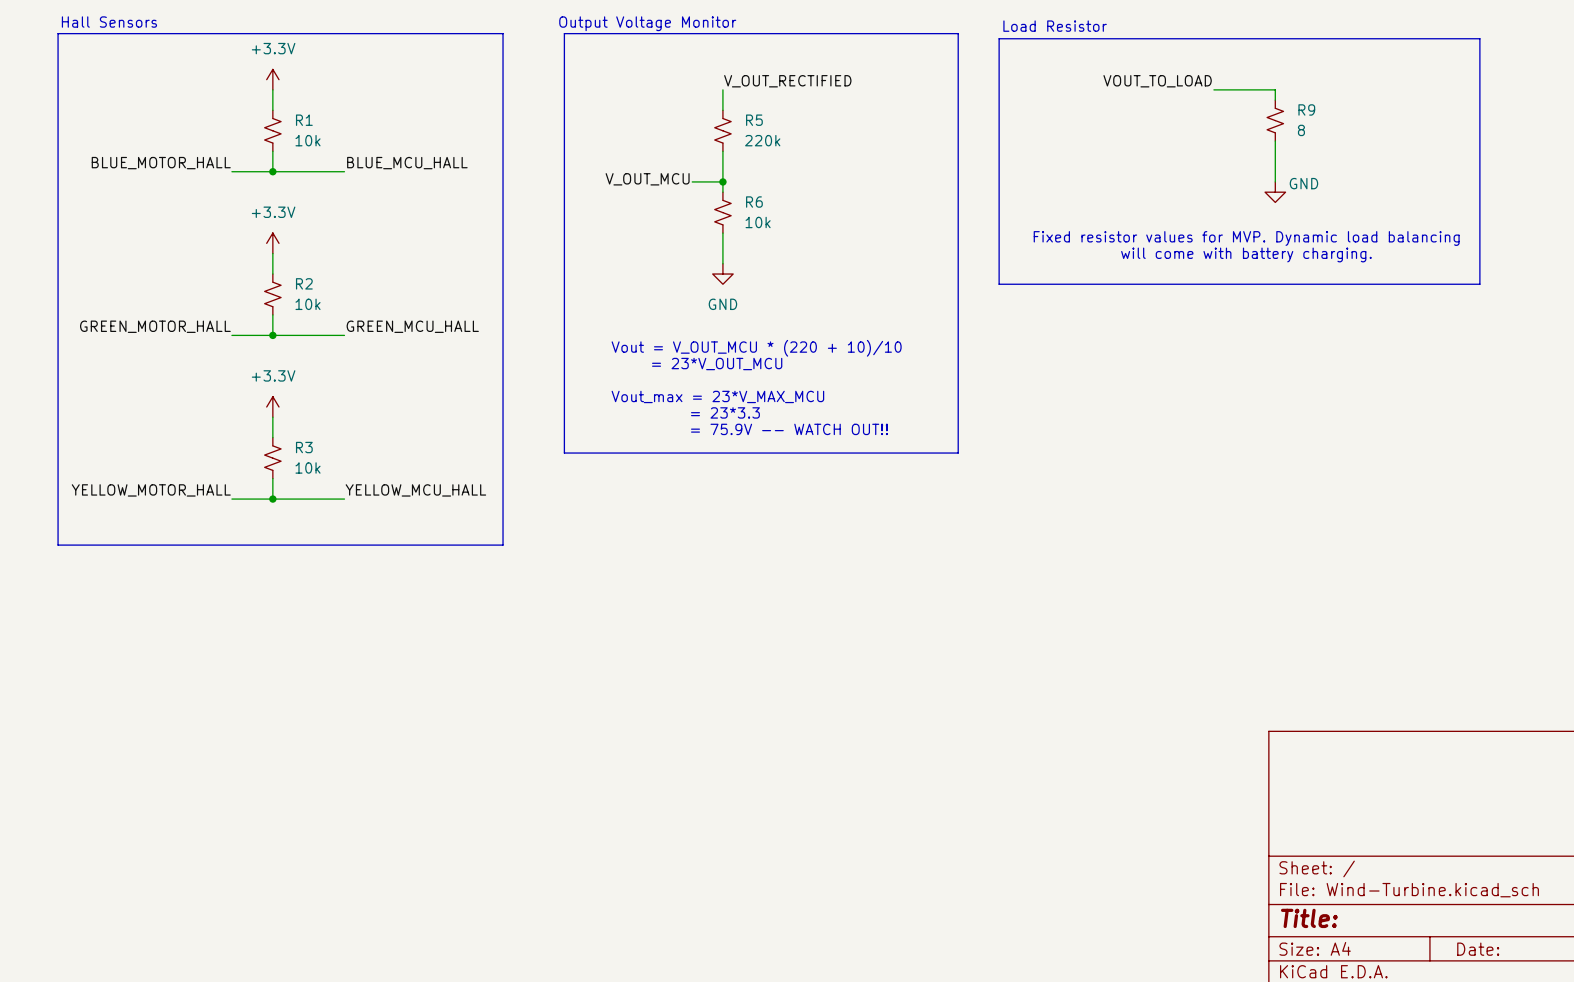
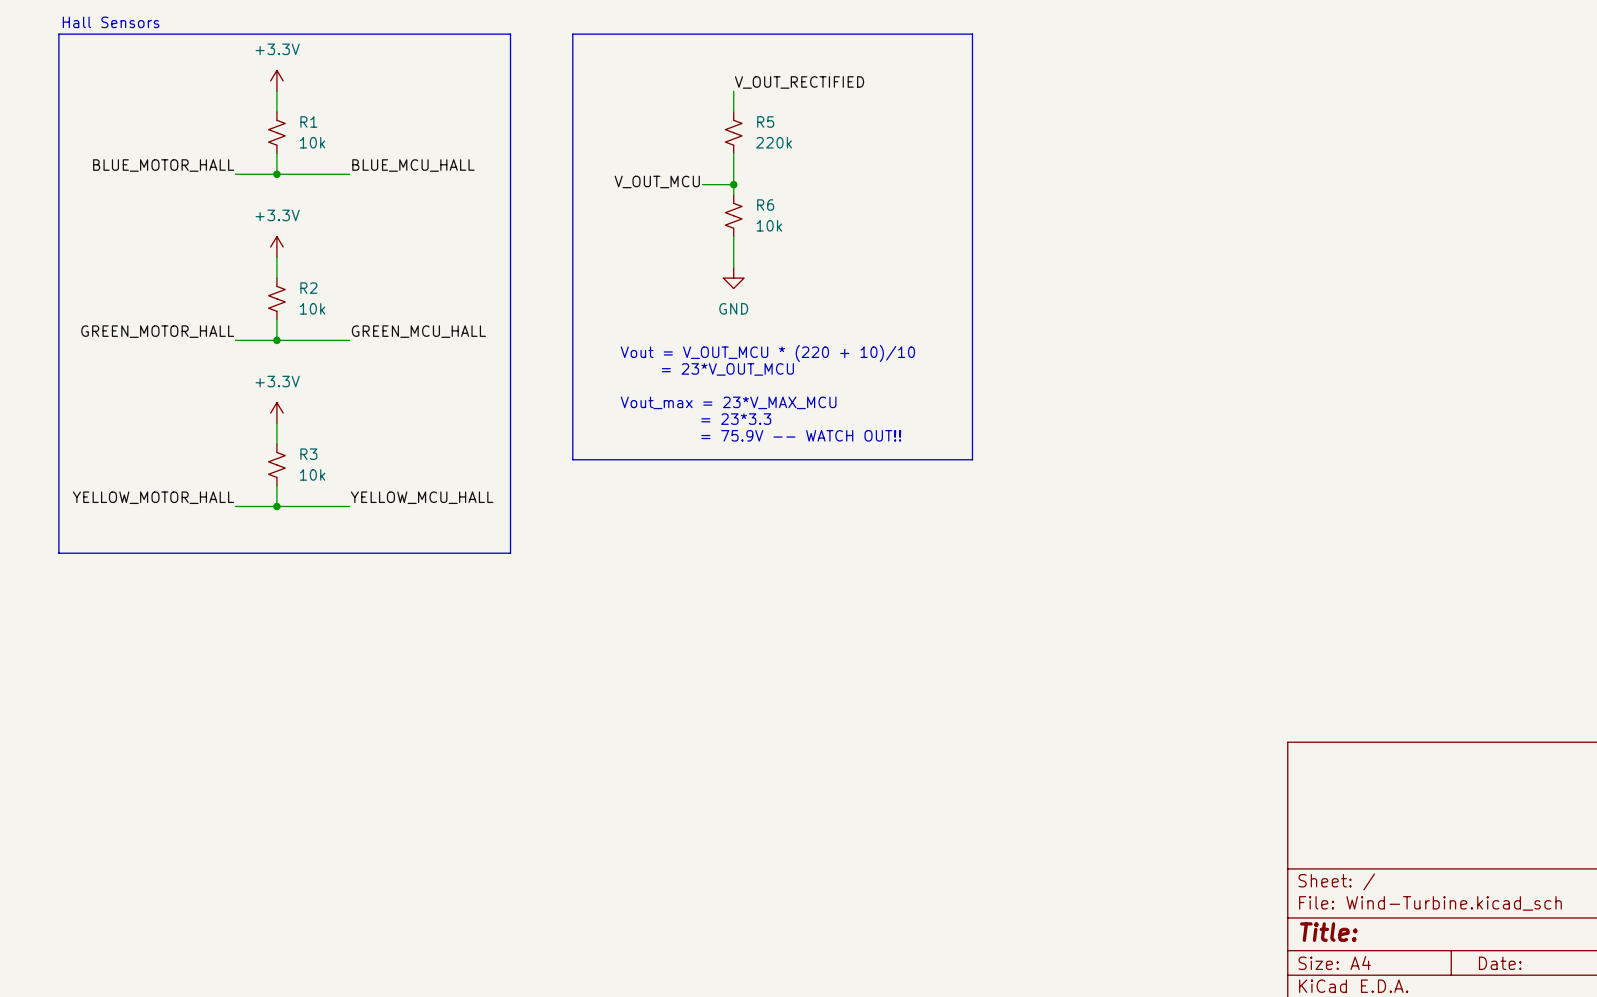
text: Output Voltage Monitor (647, 23) -> none
text: Load Resistor (1055, 26) -> none
line: (999, 38) (1479, 38) (1479, 284) (999, 284) (999, 38) -> none
label: VOUT_TO_LOAD (1157, 81) -> none
wire: (1213, 89) (1275, 89) (1275, 100) -> none
R9: 8 (1275, 120) -> none
wire: (1275, 141) (1275, 181) -> none
power symbol: GND (1275, 192) -> none
text: Fixed resistor values for MVP. Dynamic load balancing (1246, 238) -> none
text: will come with battery charging. (1246, 254) -> none

